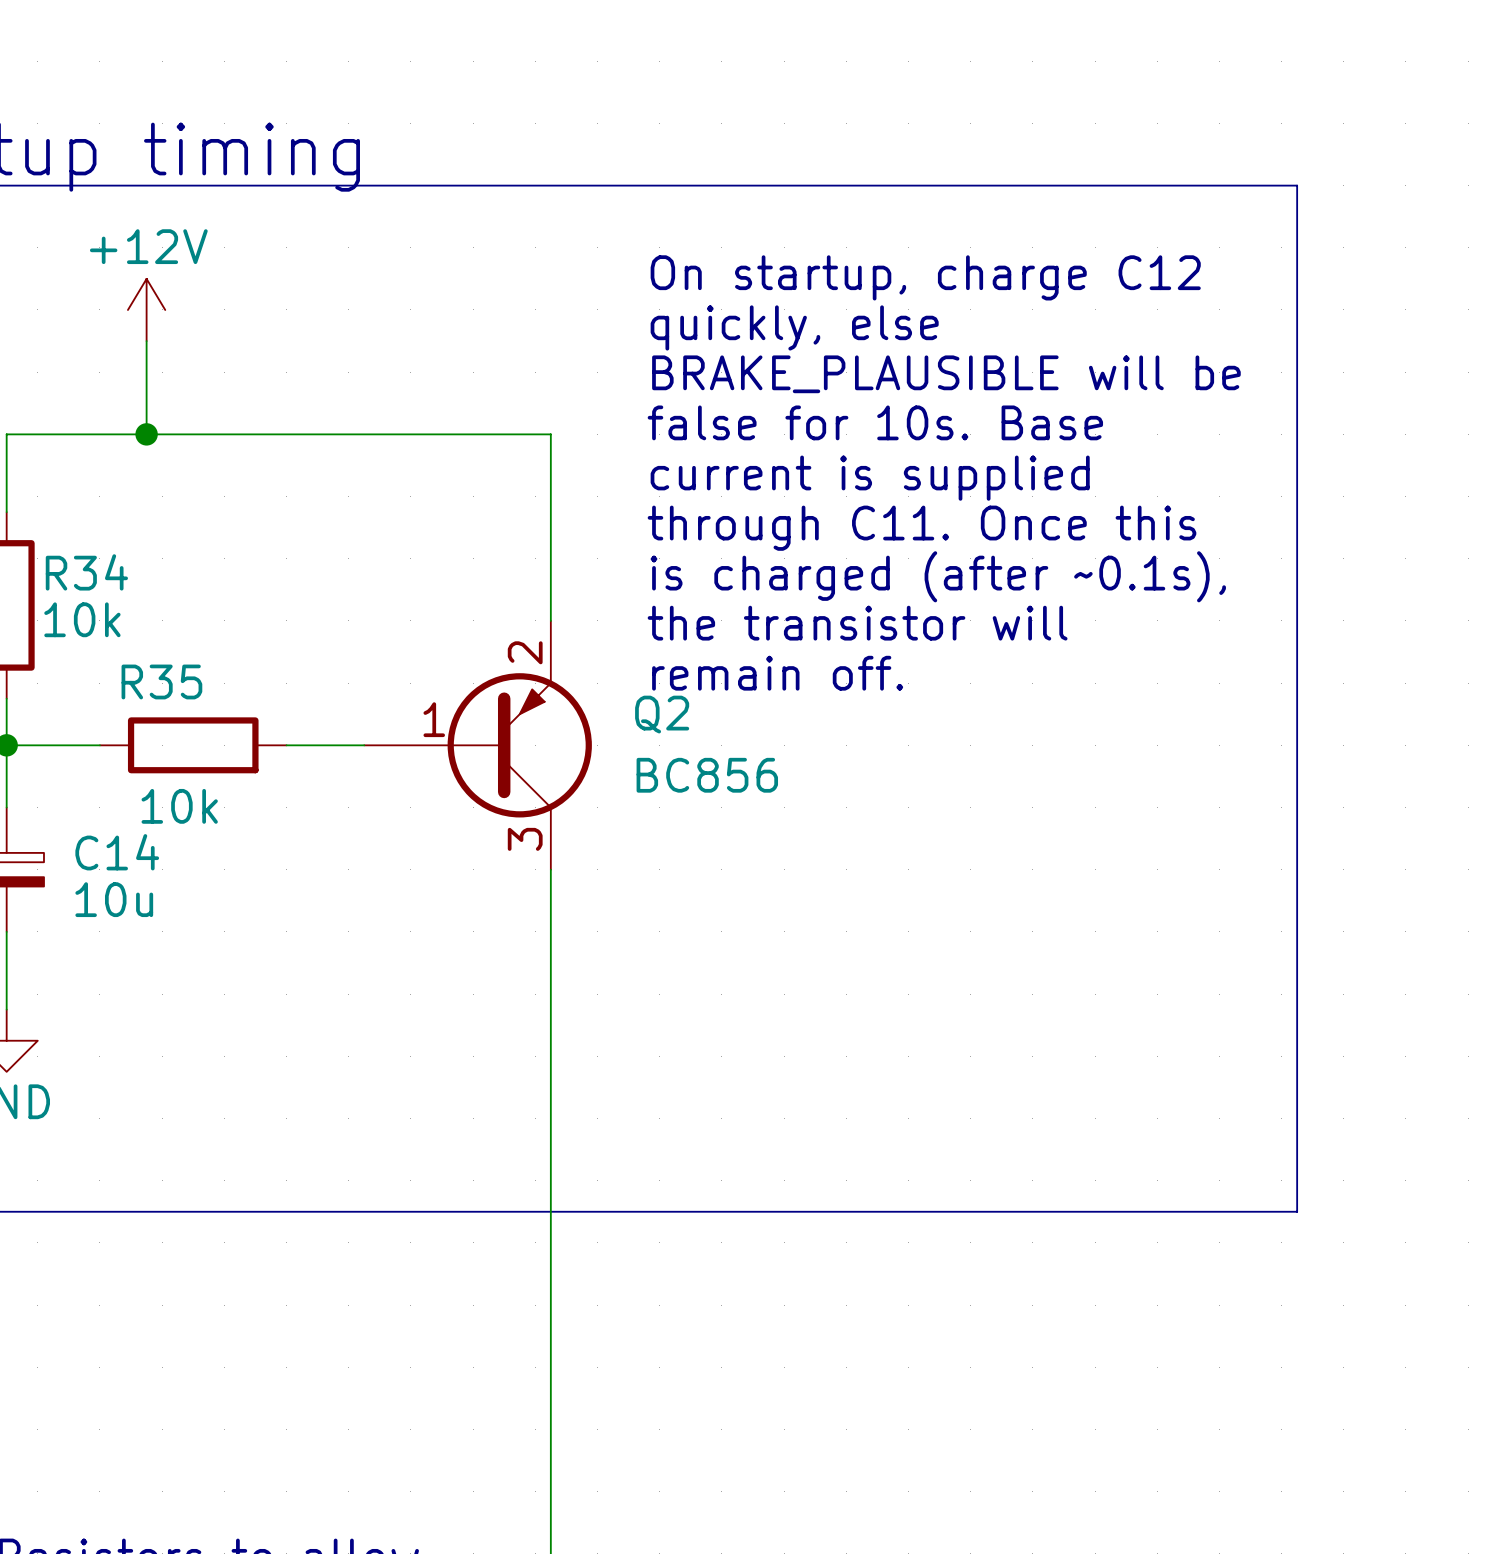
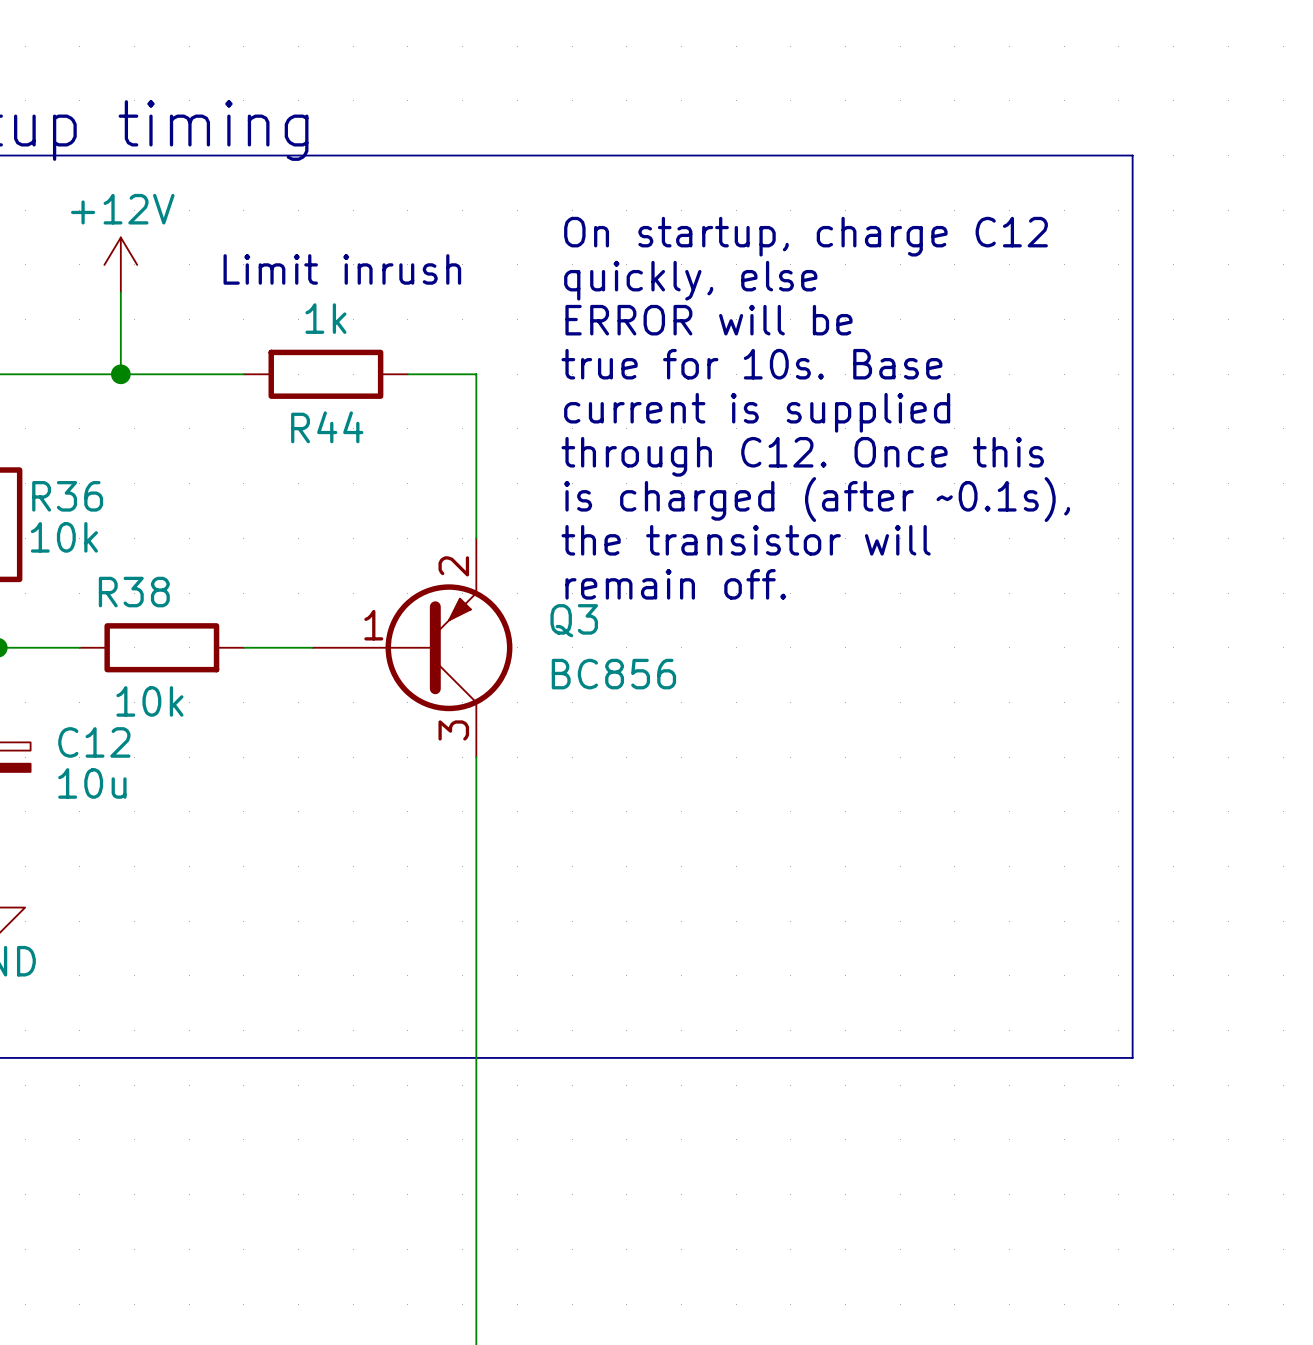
text: none -> Limit inrush (342, 269)
text: BRAKE_PLAUSIBLE will be (946, 374) -> ERROR will be (708, 320)
text: false for 10s. Base (875, 422) -> true for 10s. Base (751, 364)
wire: (286, 434) (473, 434) -> none
R44: none -> 1k (325, 374)
text: through C11. Once this (922, 528) -> through C12. Once this (802, 456)
R34 name: R34 (86, 572) -> R36 (67, 496)
R35 name: R35 (161, 681) -> R38 (134, 592)
Q2 name: Q2 (662, 714) -> Q3 (574, 620)
C14 name: C14 (117, 852) -> C12 (94, 742)

